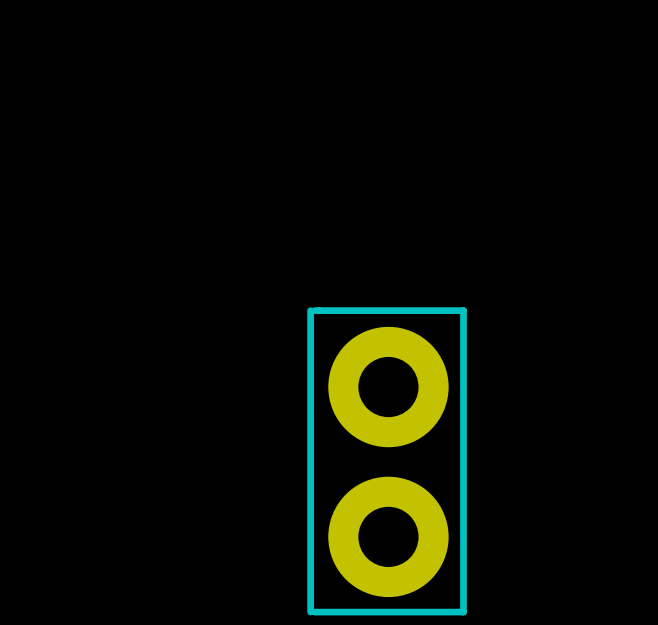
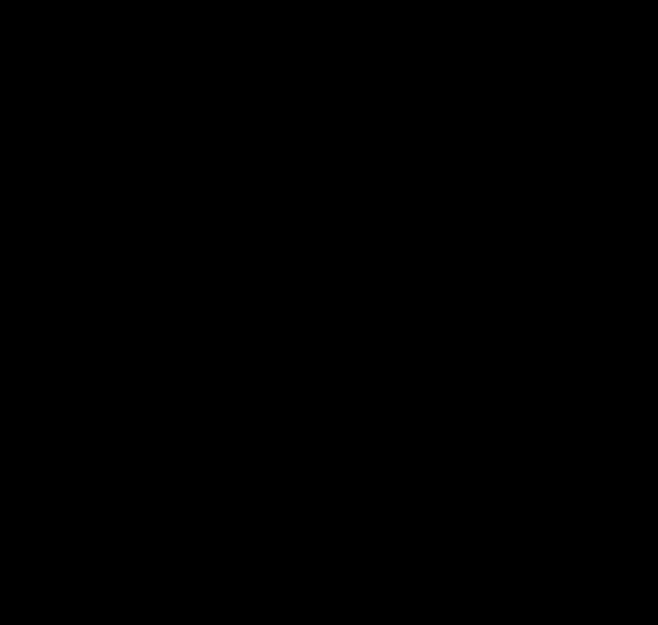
line: (310, 310) (310, 612) -> none
line: (314, 310) (463, 310) (463, 612) (314, 612) -> none
part: (388, 387) -> none
part: (388, 536) -> none

